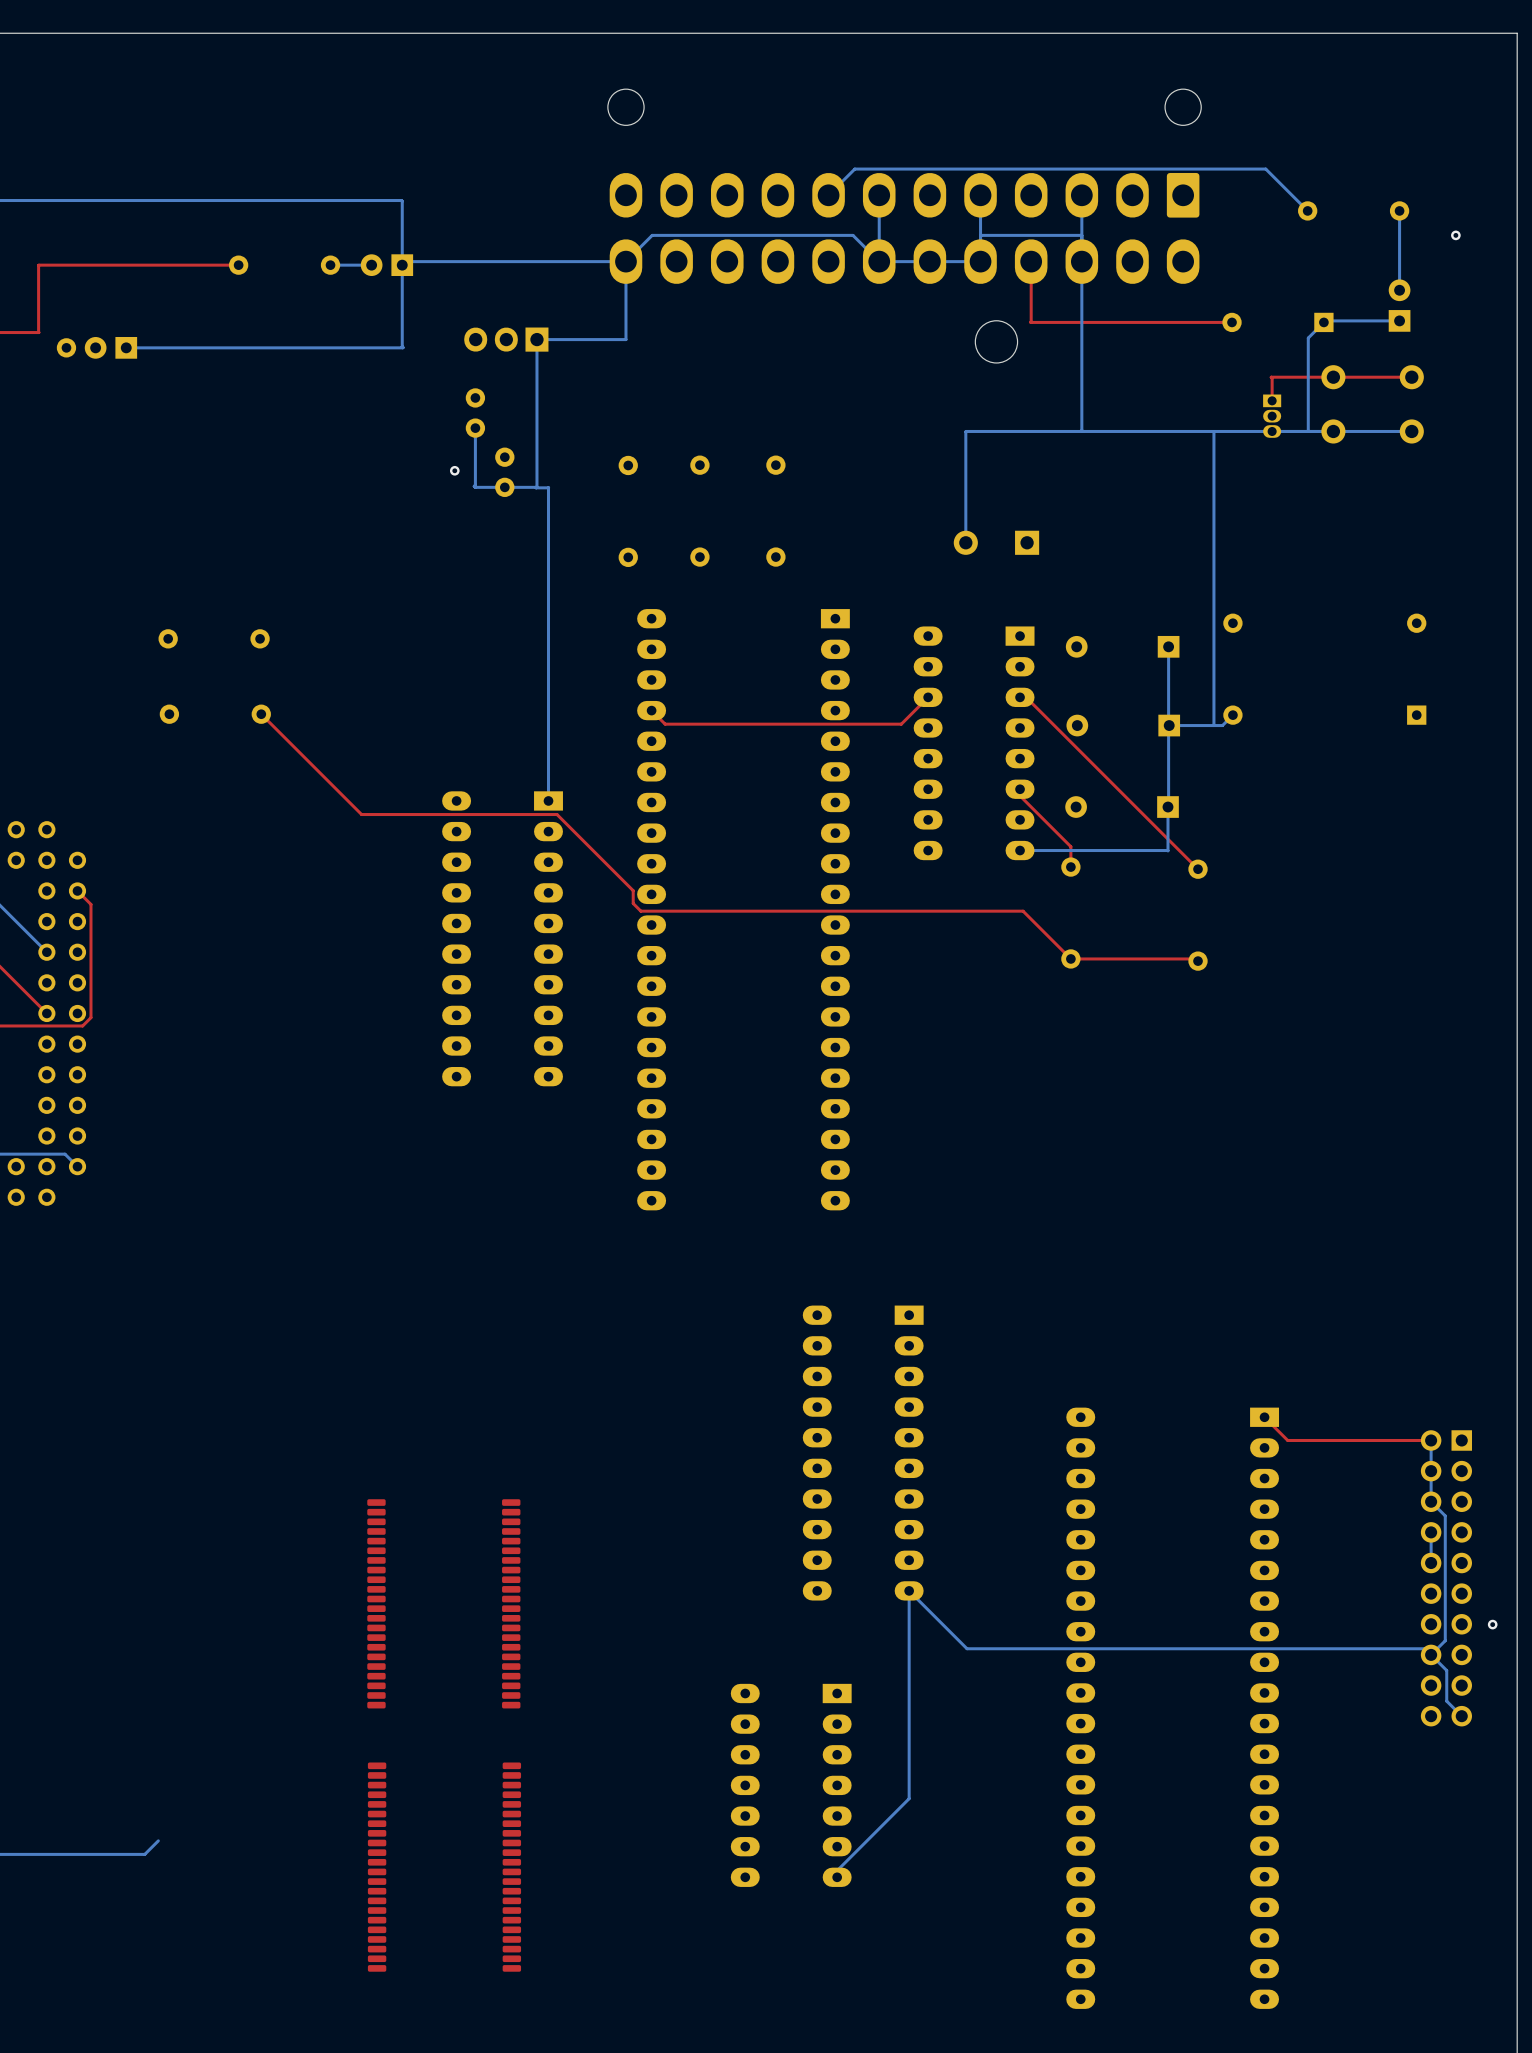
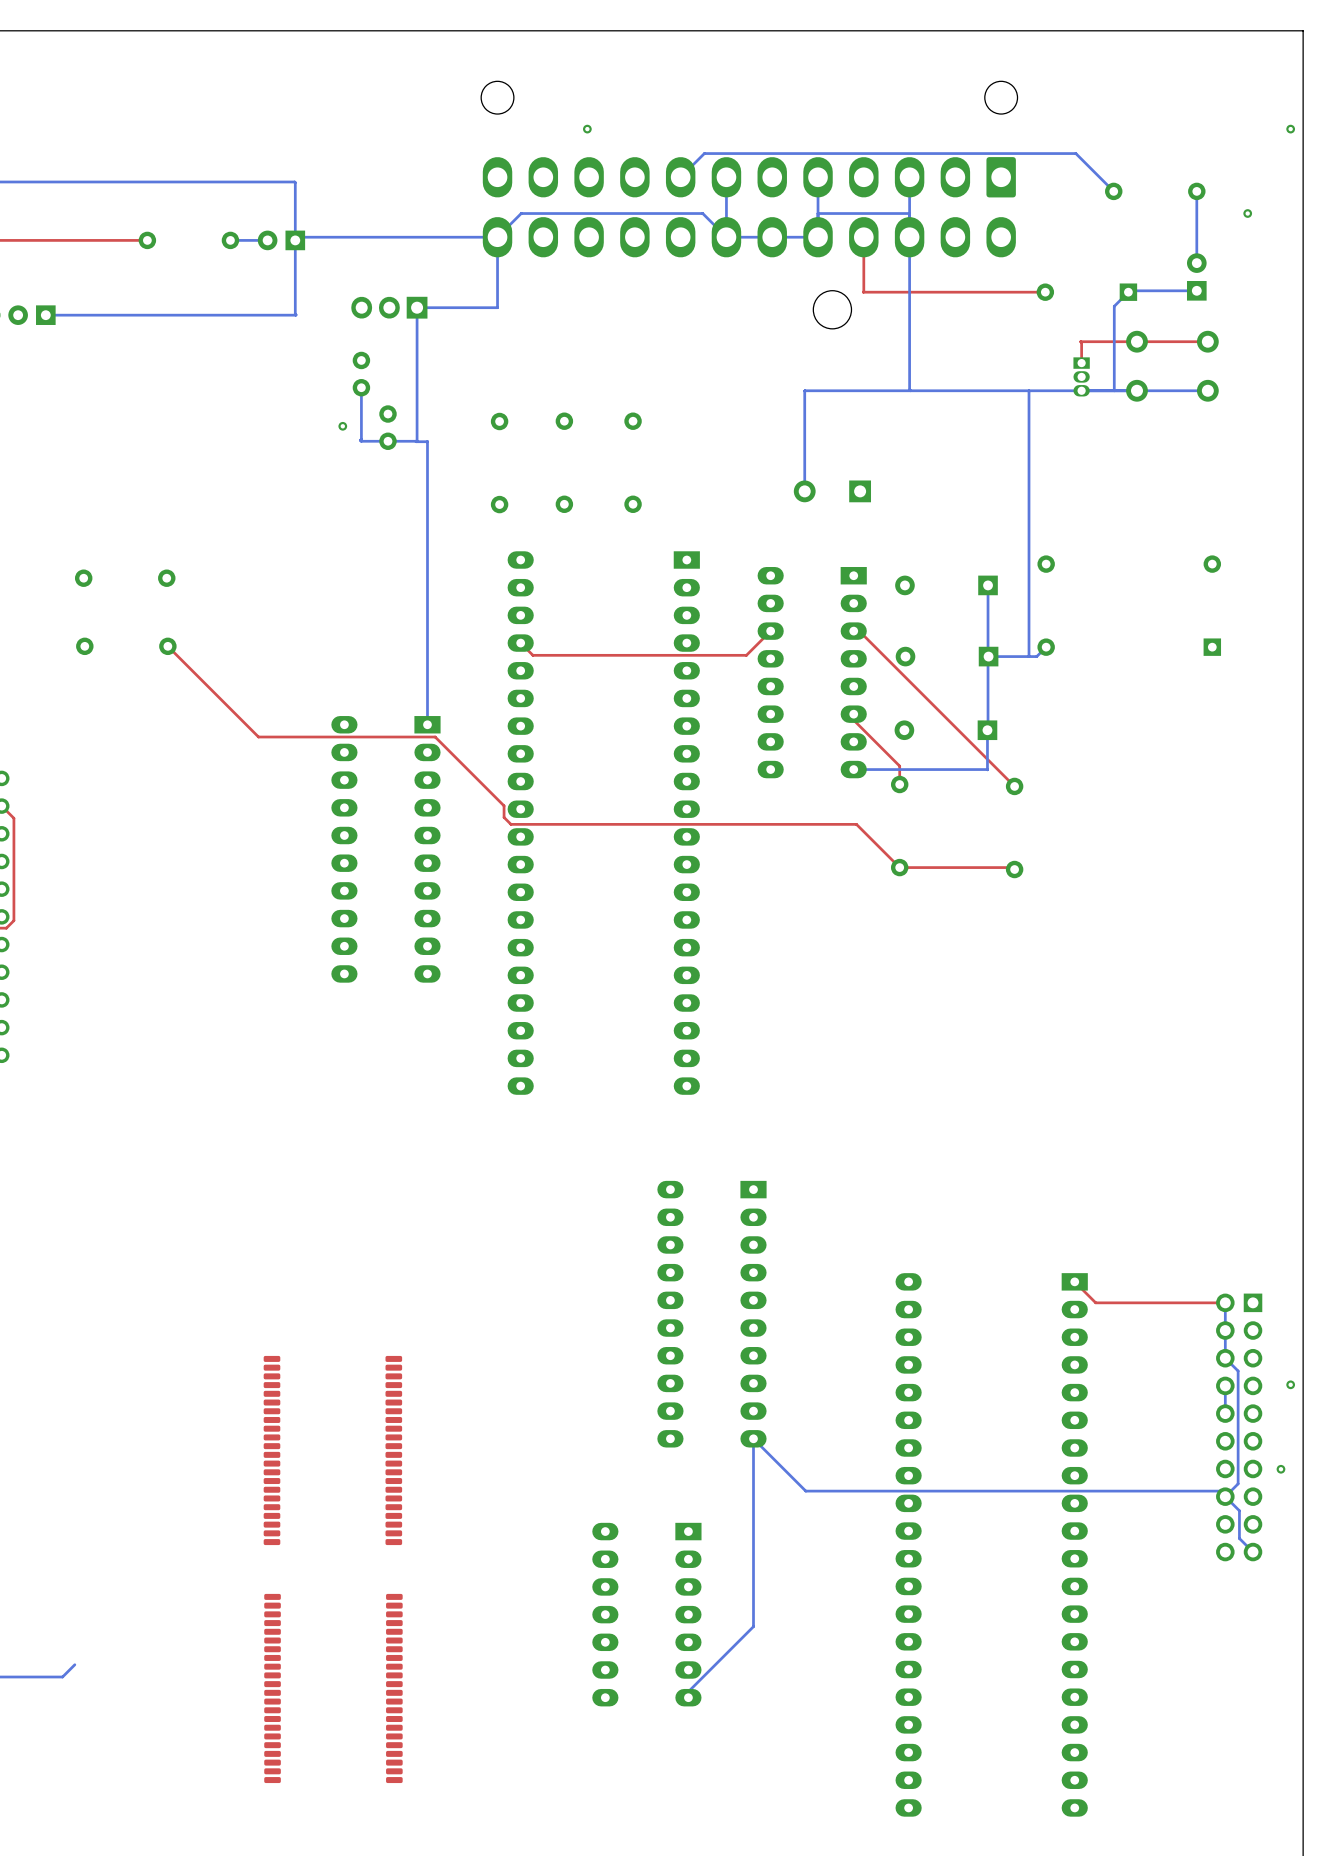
via: none -> (587, 129)
via: none -> (1290, 129)
via: none -> (1290, 1384)

